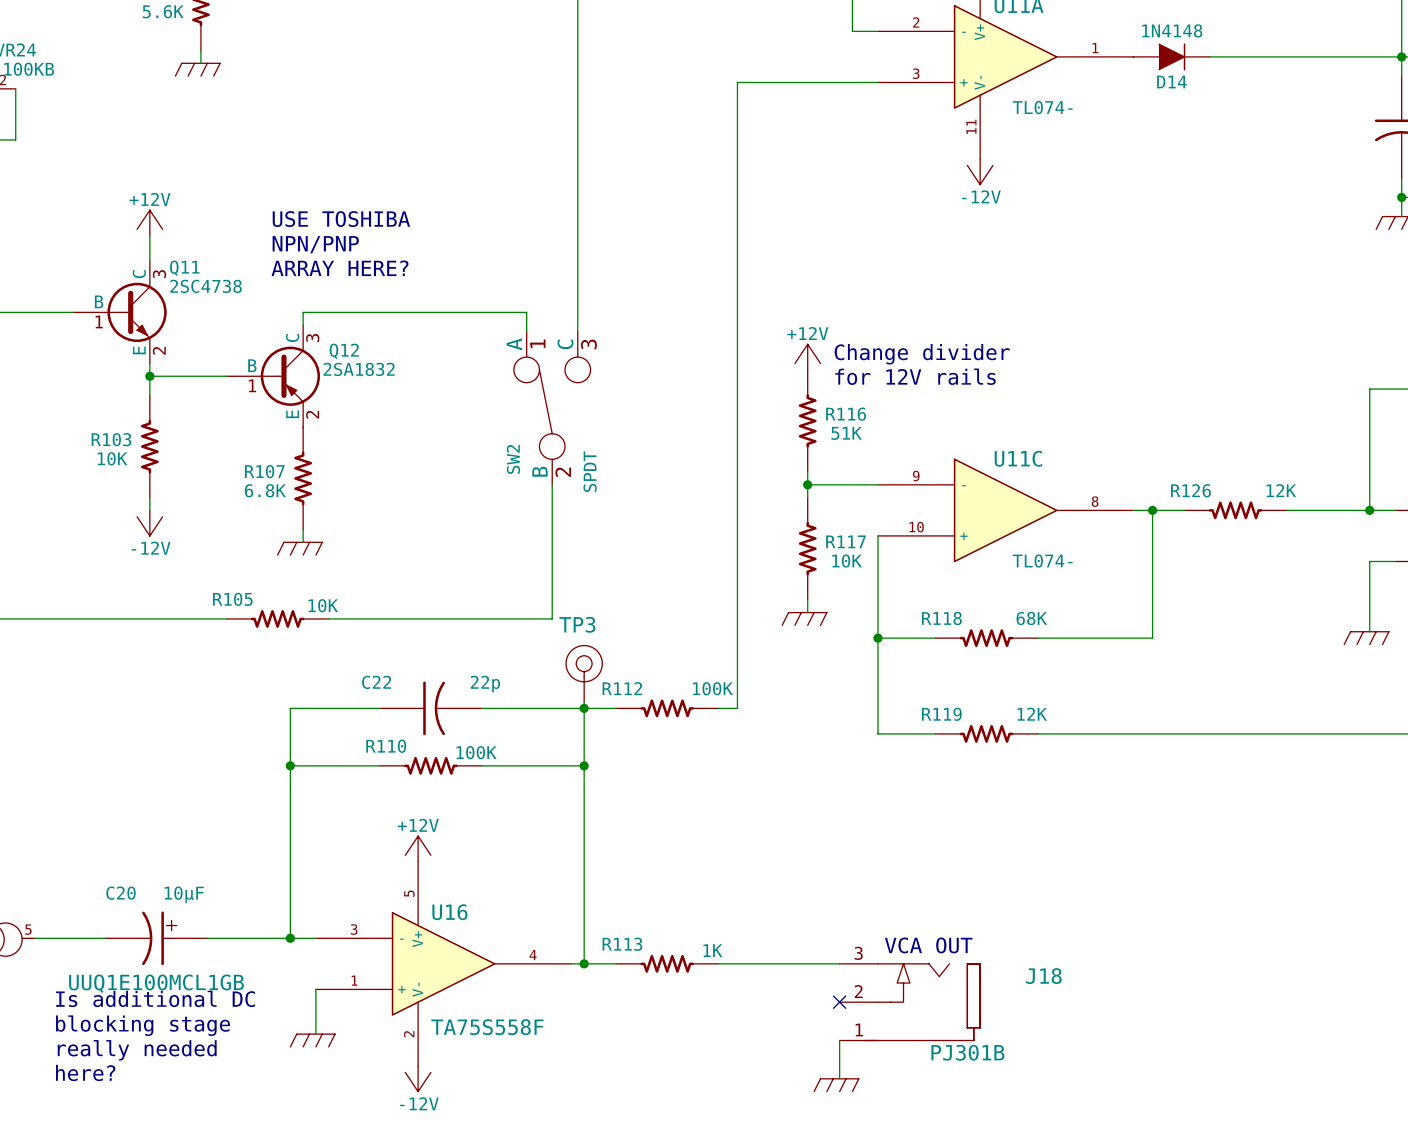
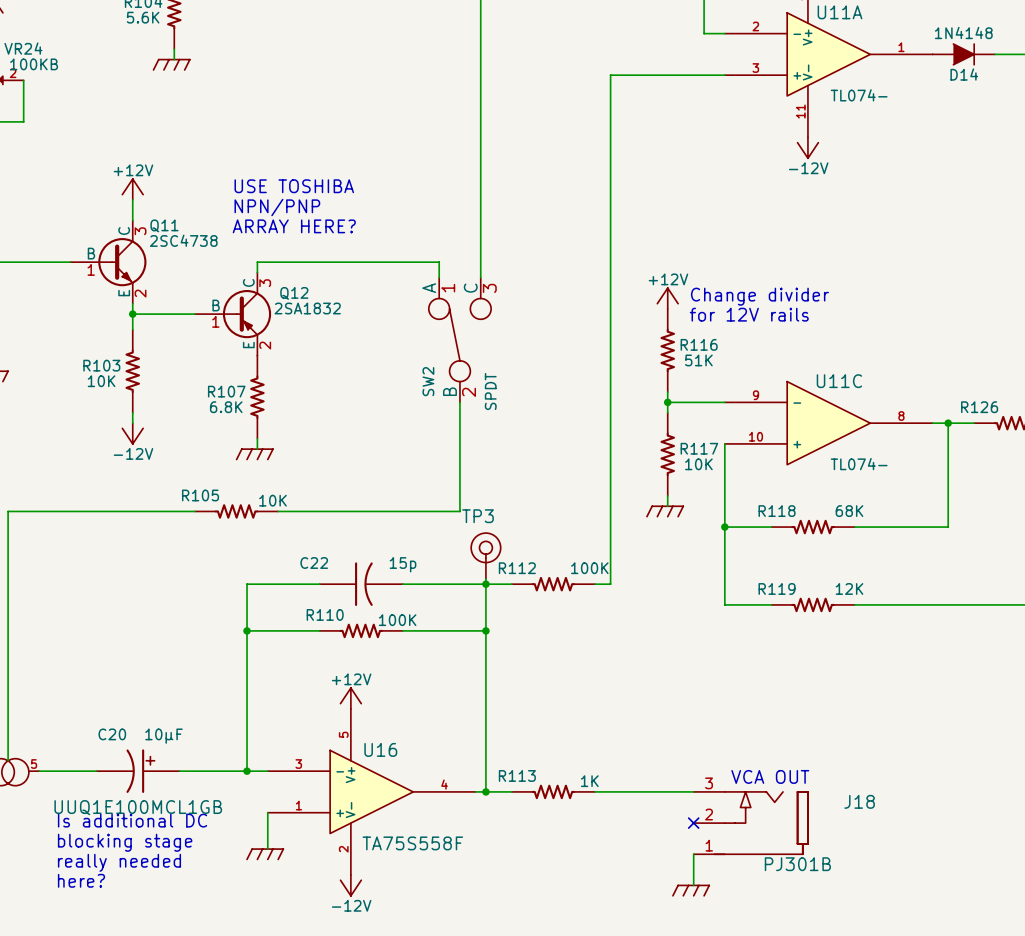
C22 value: 22p (485, 684) -> 15p (403, 564)

